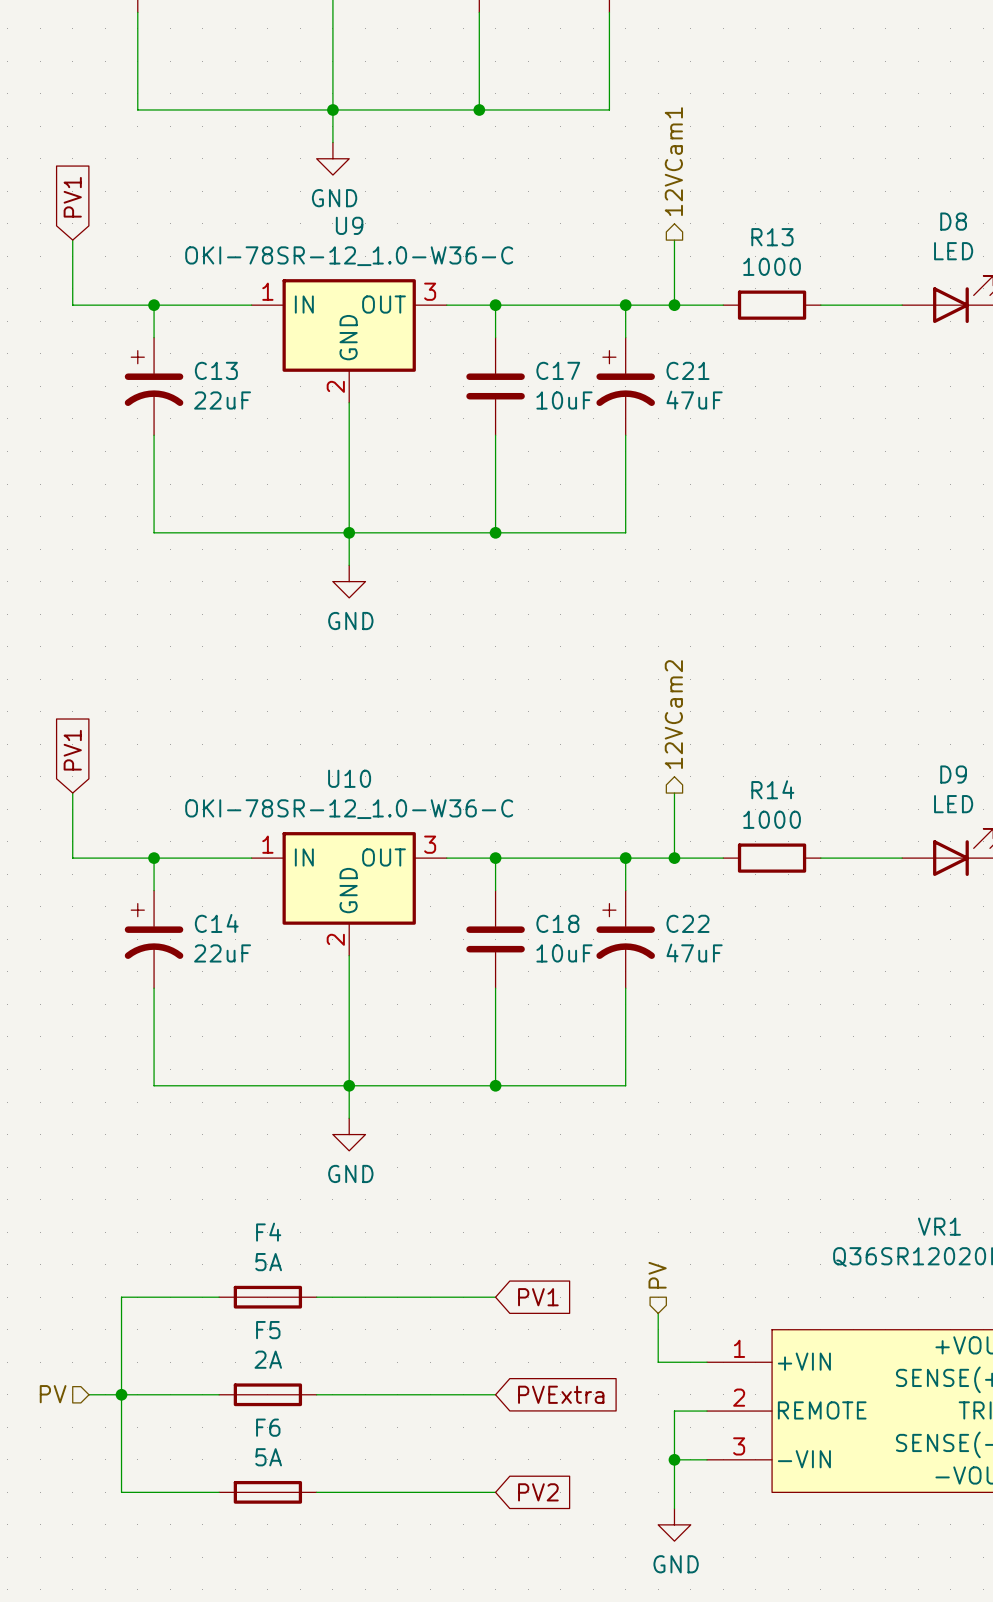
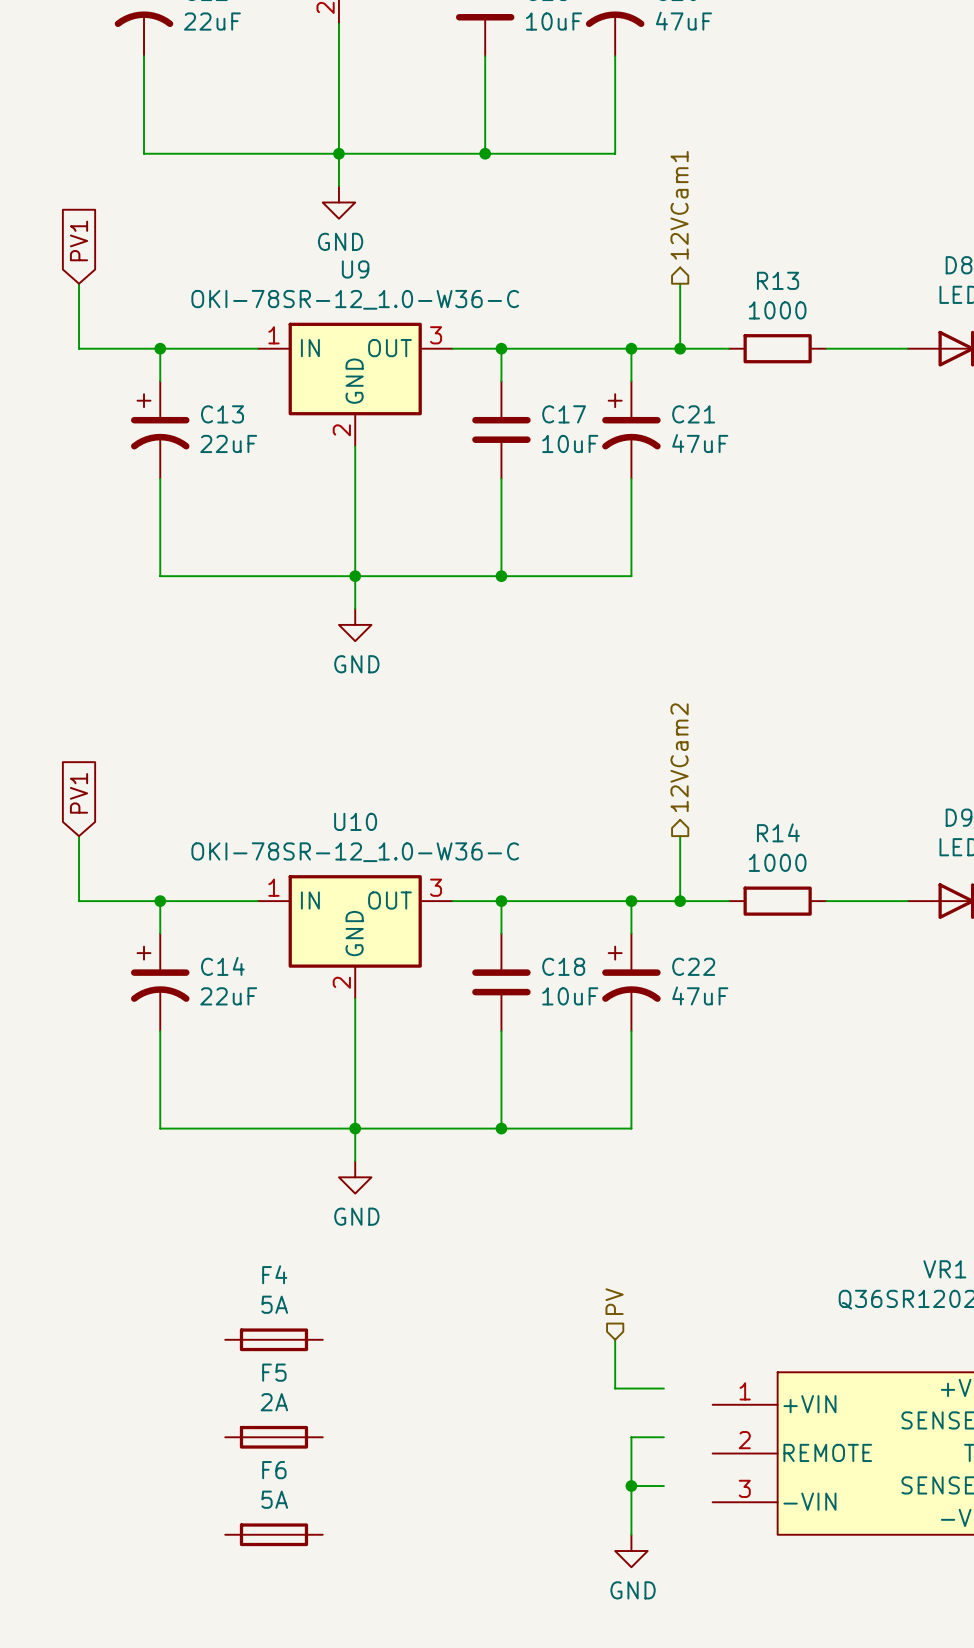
hierarchical label position: PV (657, 1275) -> PV (614, 1301)
wire: (219, 1297) (121, 1297) (121, 1492) (219, 1492) -> none
wire: (316, 1297) (495, 1297) -> none
global label: PV1 (538, 1297) -> none
wire: (658, 1313) (658, 1362) (706, 1362) -> (615, 1339) (615, 1388) (663, 1388)
hierarchical label: PV (53, 1394) -> none
wire: (88, 1394) (219, 1394) -> none
junction: (121, 1394) -> none
wire: (316, 1394) (495, 1394) -> none
global label: PVExtra (561, 1394) -> none
wire: (706, 1411) (674, 1411) (674, 1508) -> (663, 1437) (631, 1437) (631, 1534)
wire: (674, 1459) (706, 1459) -> (631, 1486) (663, 1486)
junction position: (674, 1459) -> (631, 1486)
wire: (316, 1492) (495, 1492) -> none
global label: PV2 (538, 1492) -> none
power symbol position: GND (674, 1524) -> GND (631, 1551)

